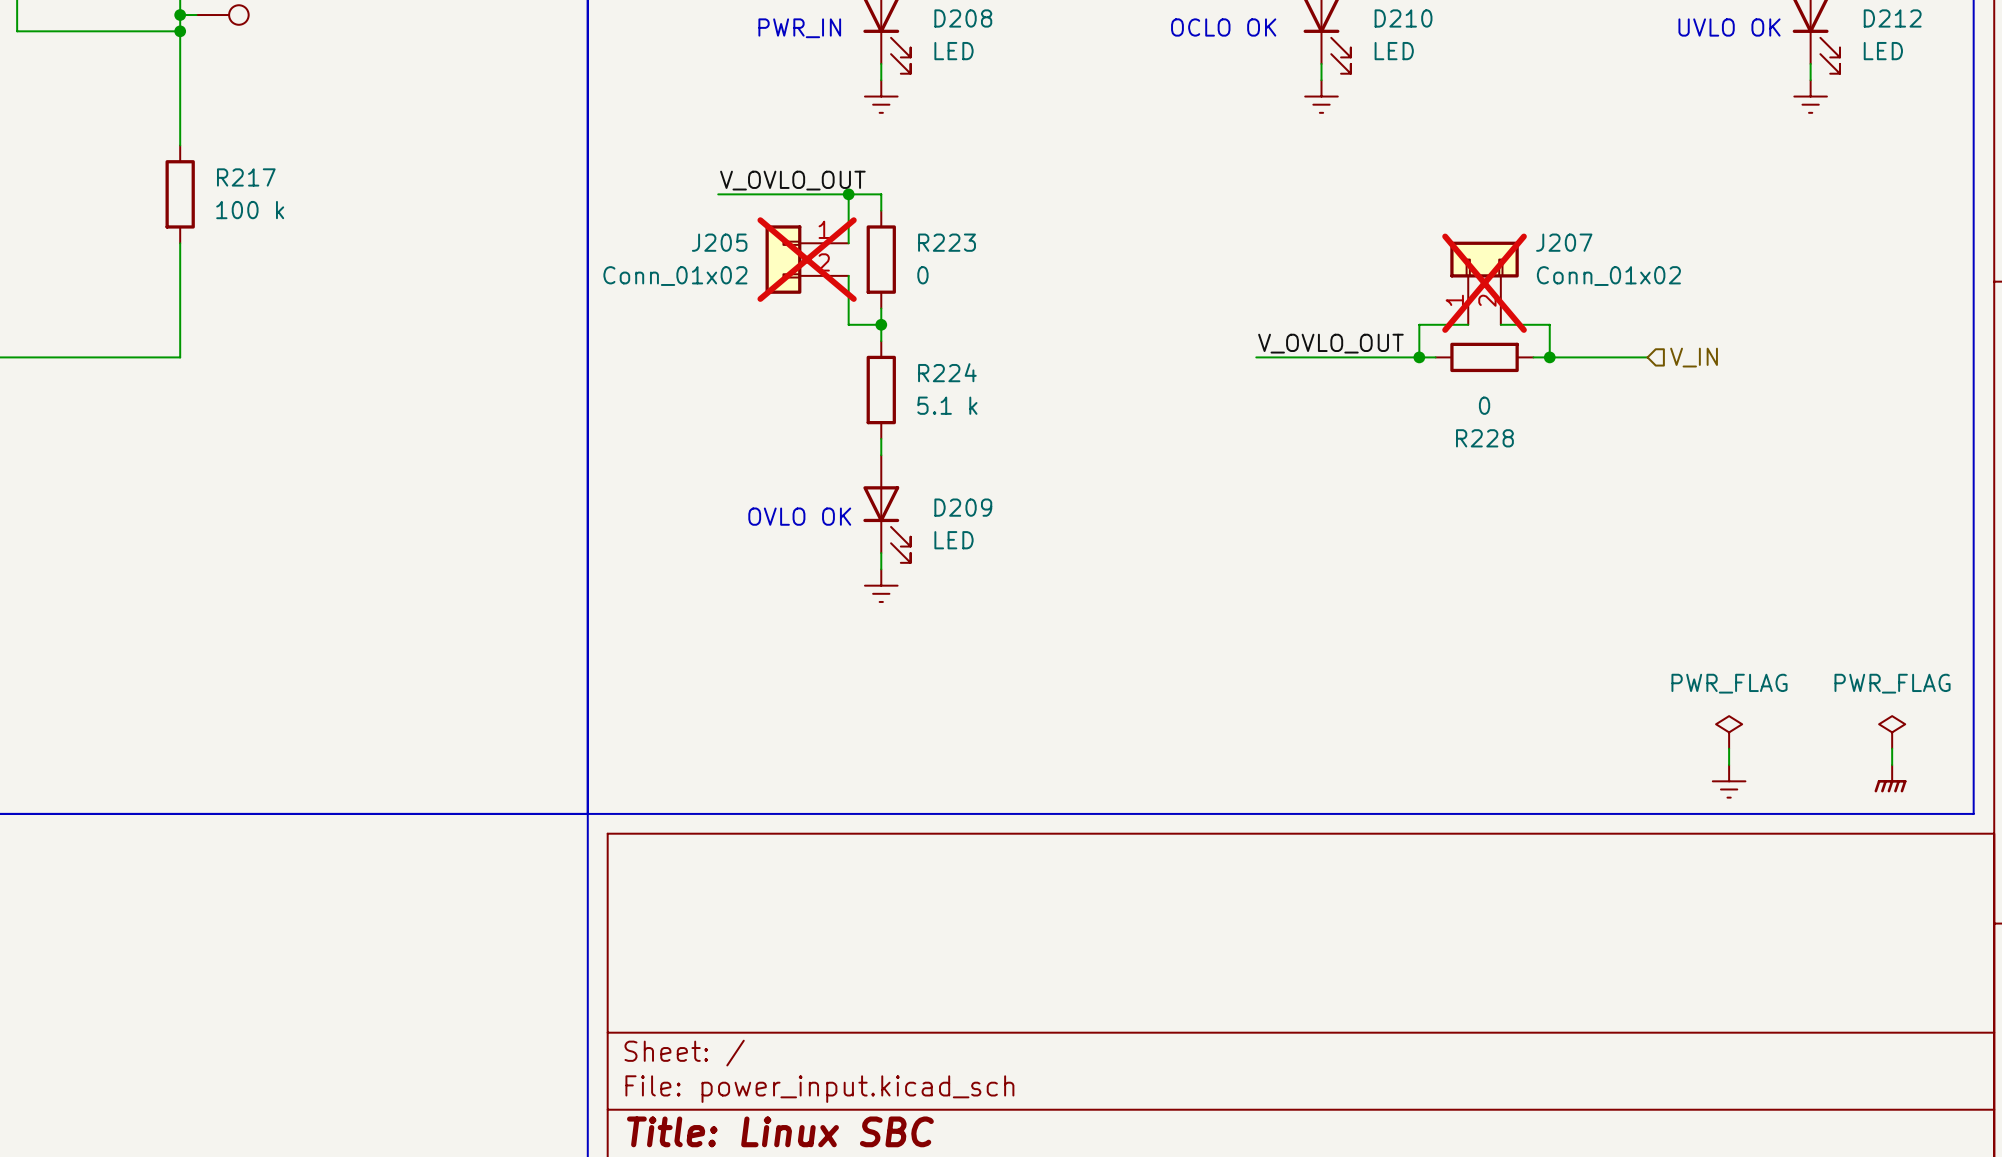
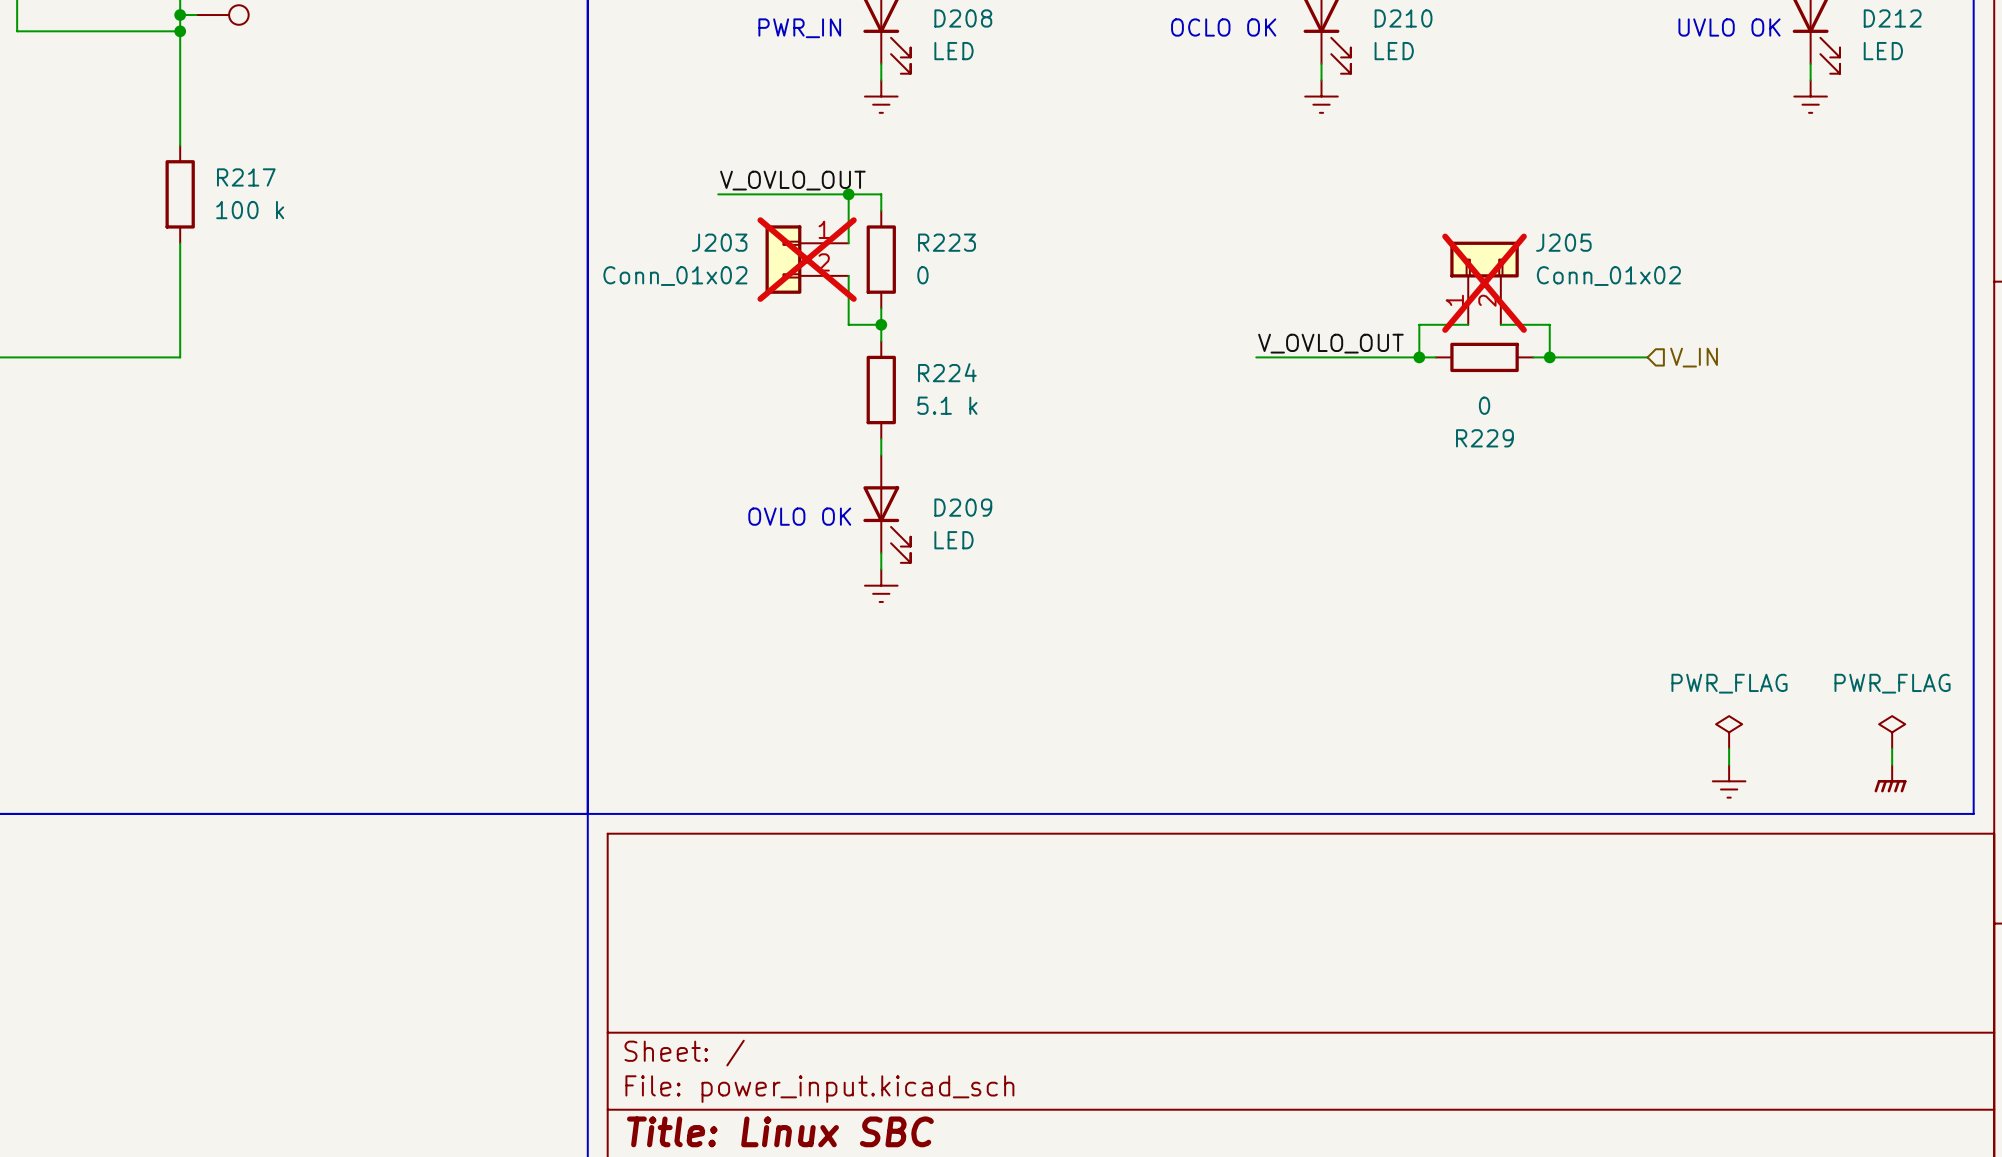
J205 name: J205 (719, 242) -> J203 (719, 242)
J207 name: J207 (1564, 242) -> J205 (1563, 242)
R228 name: R228 (1484, 438) -> R229 (1484, 438)

